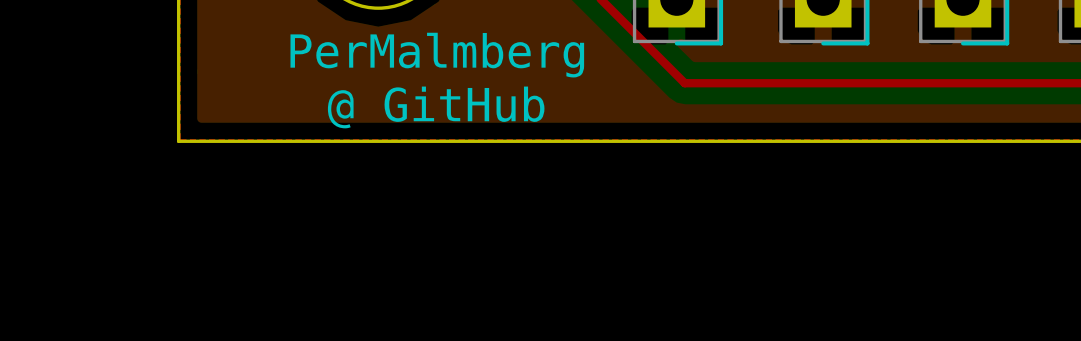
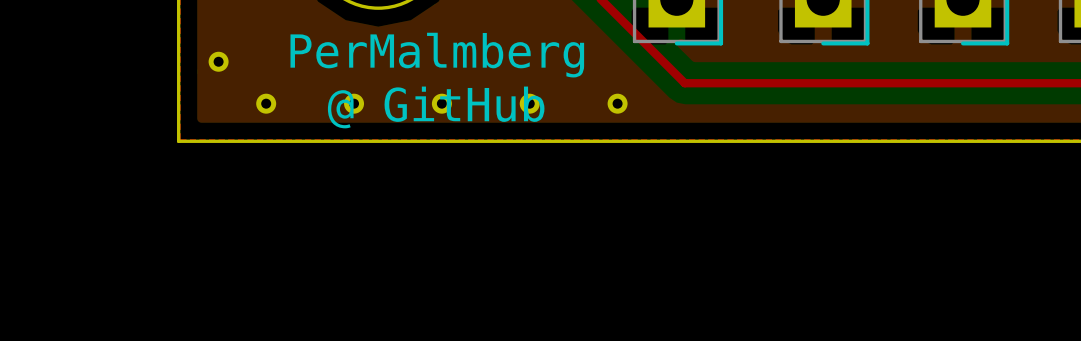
part: none -> (218, 61)
part: none -> (266, 103)
part: none -> (354, 103)
part: none -> (441, 103)
part: none -> (529, 103)
part: none -> (617, 103)

